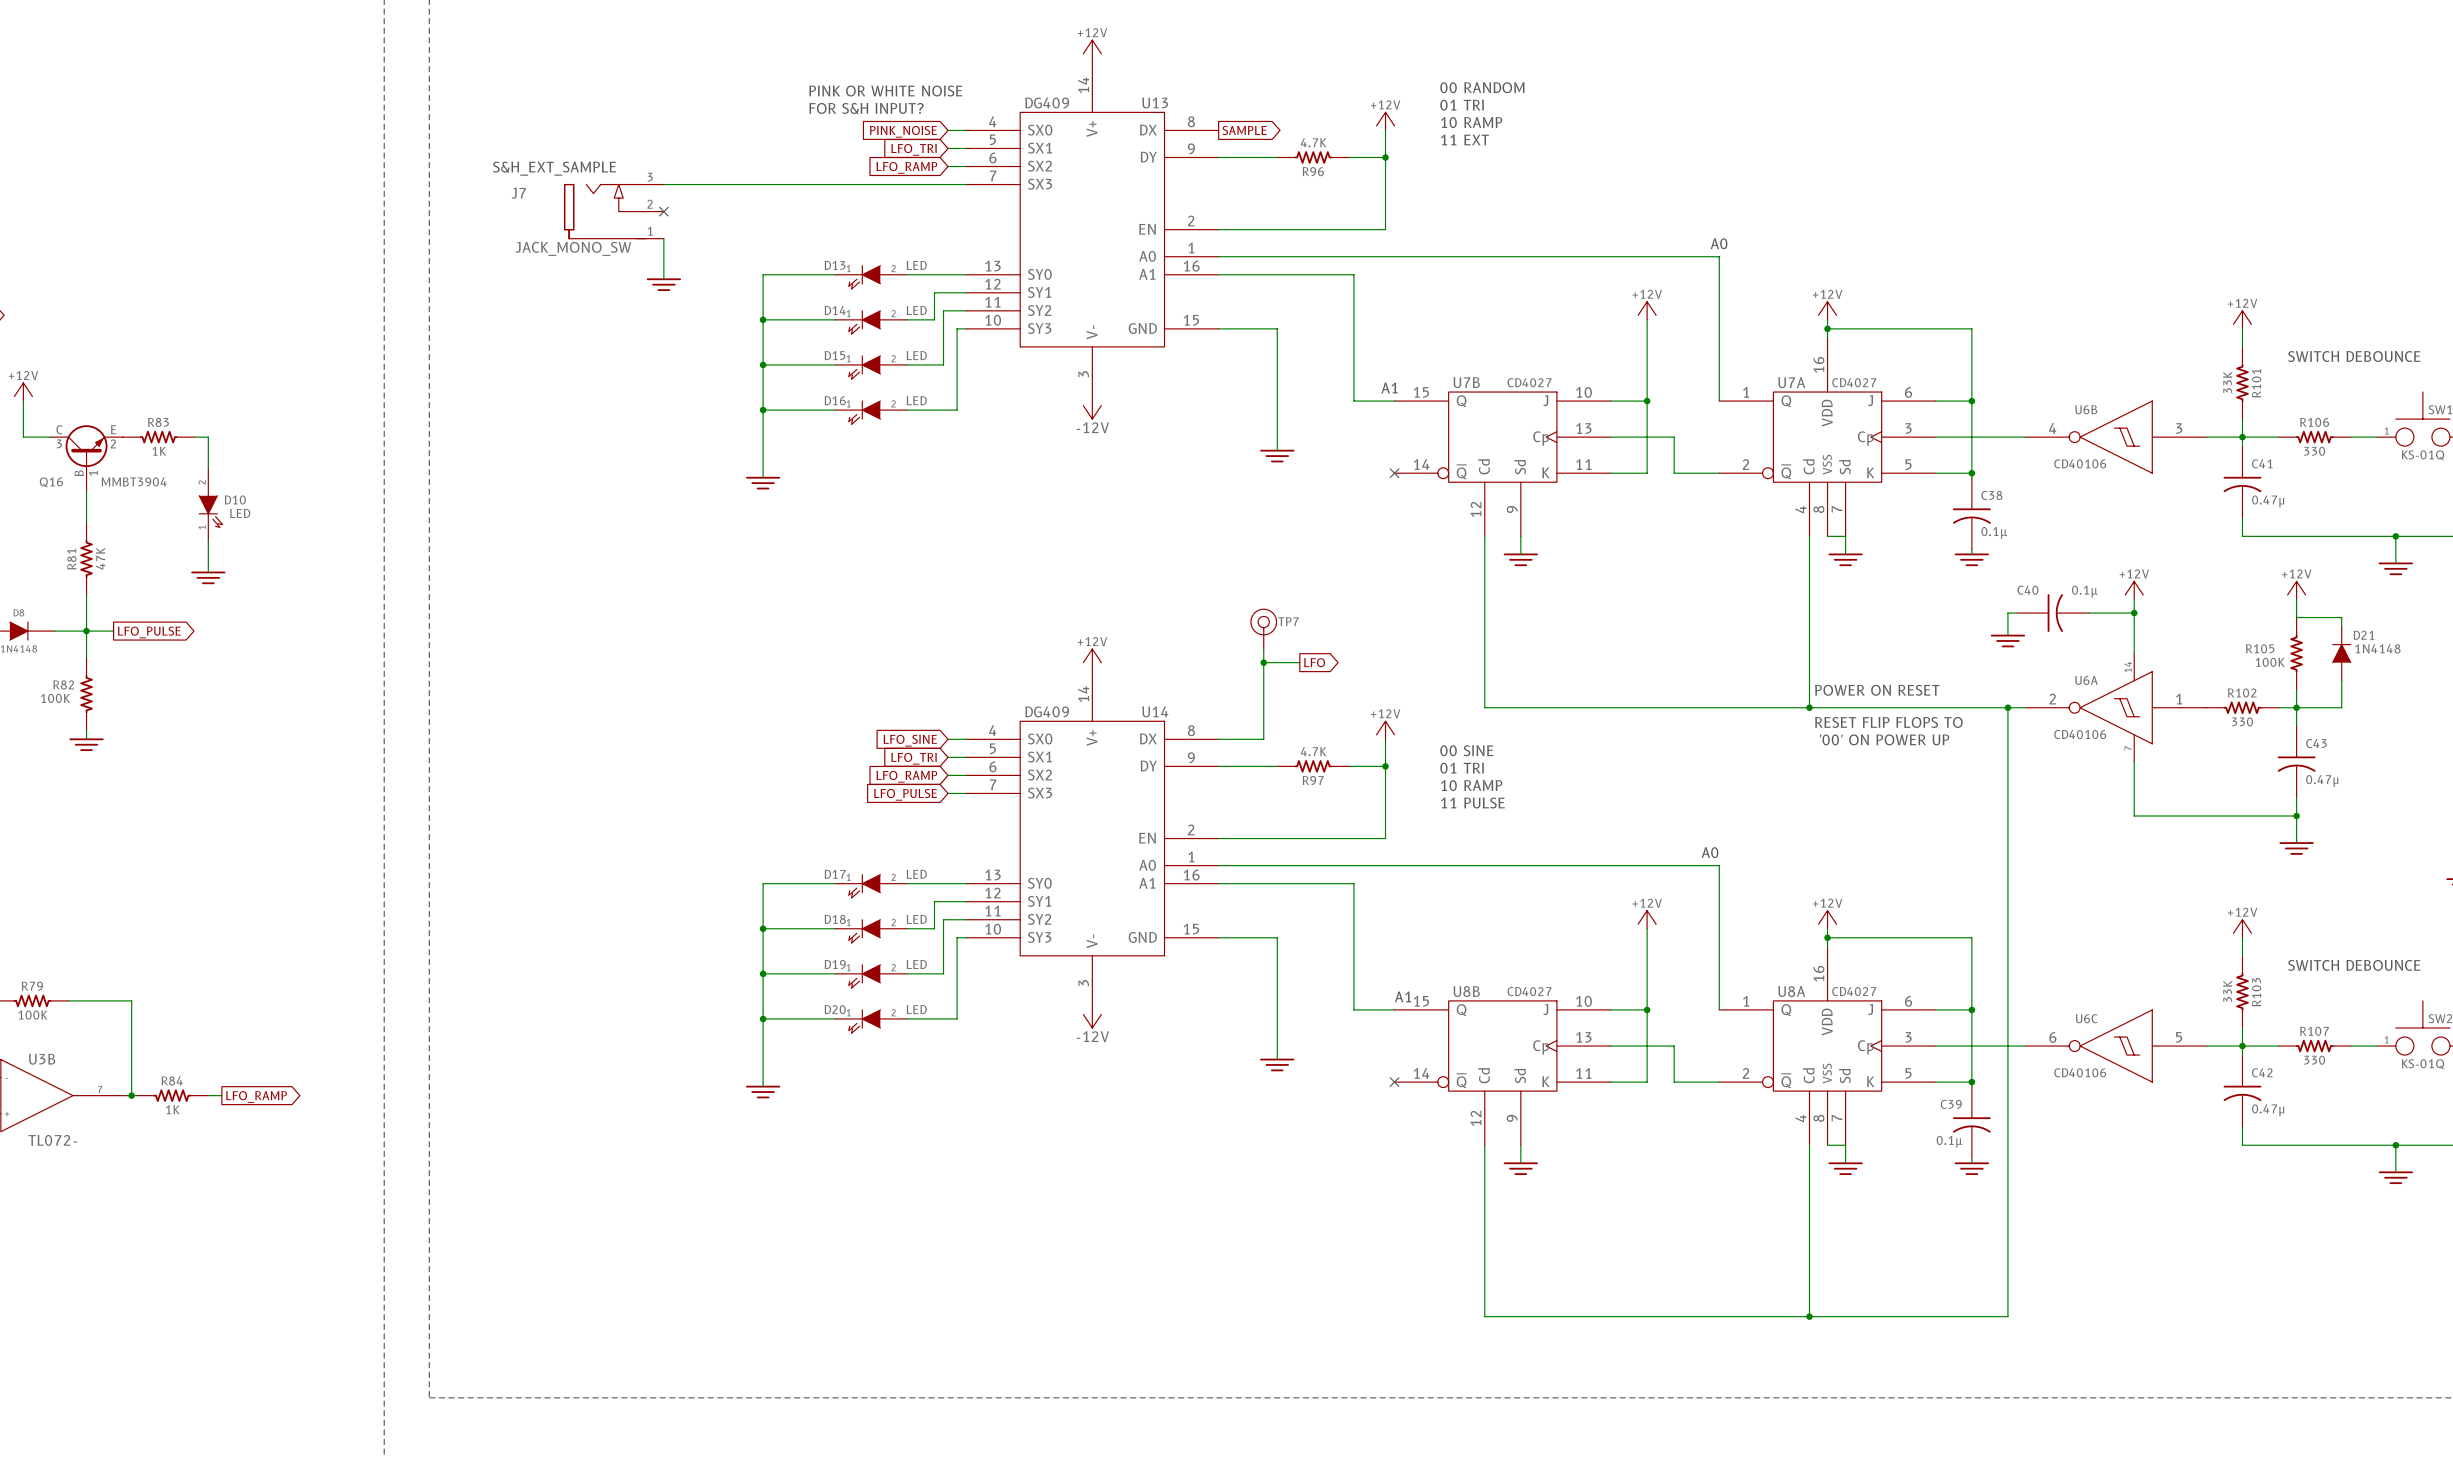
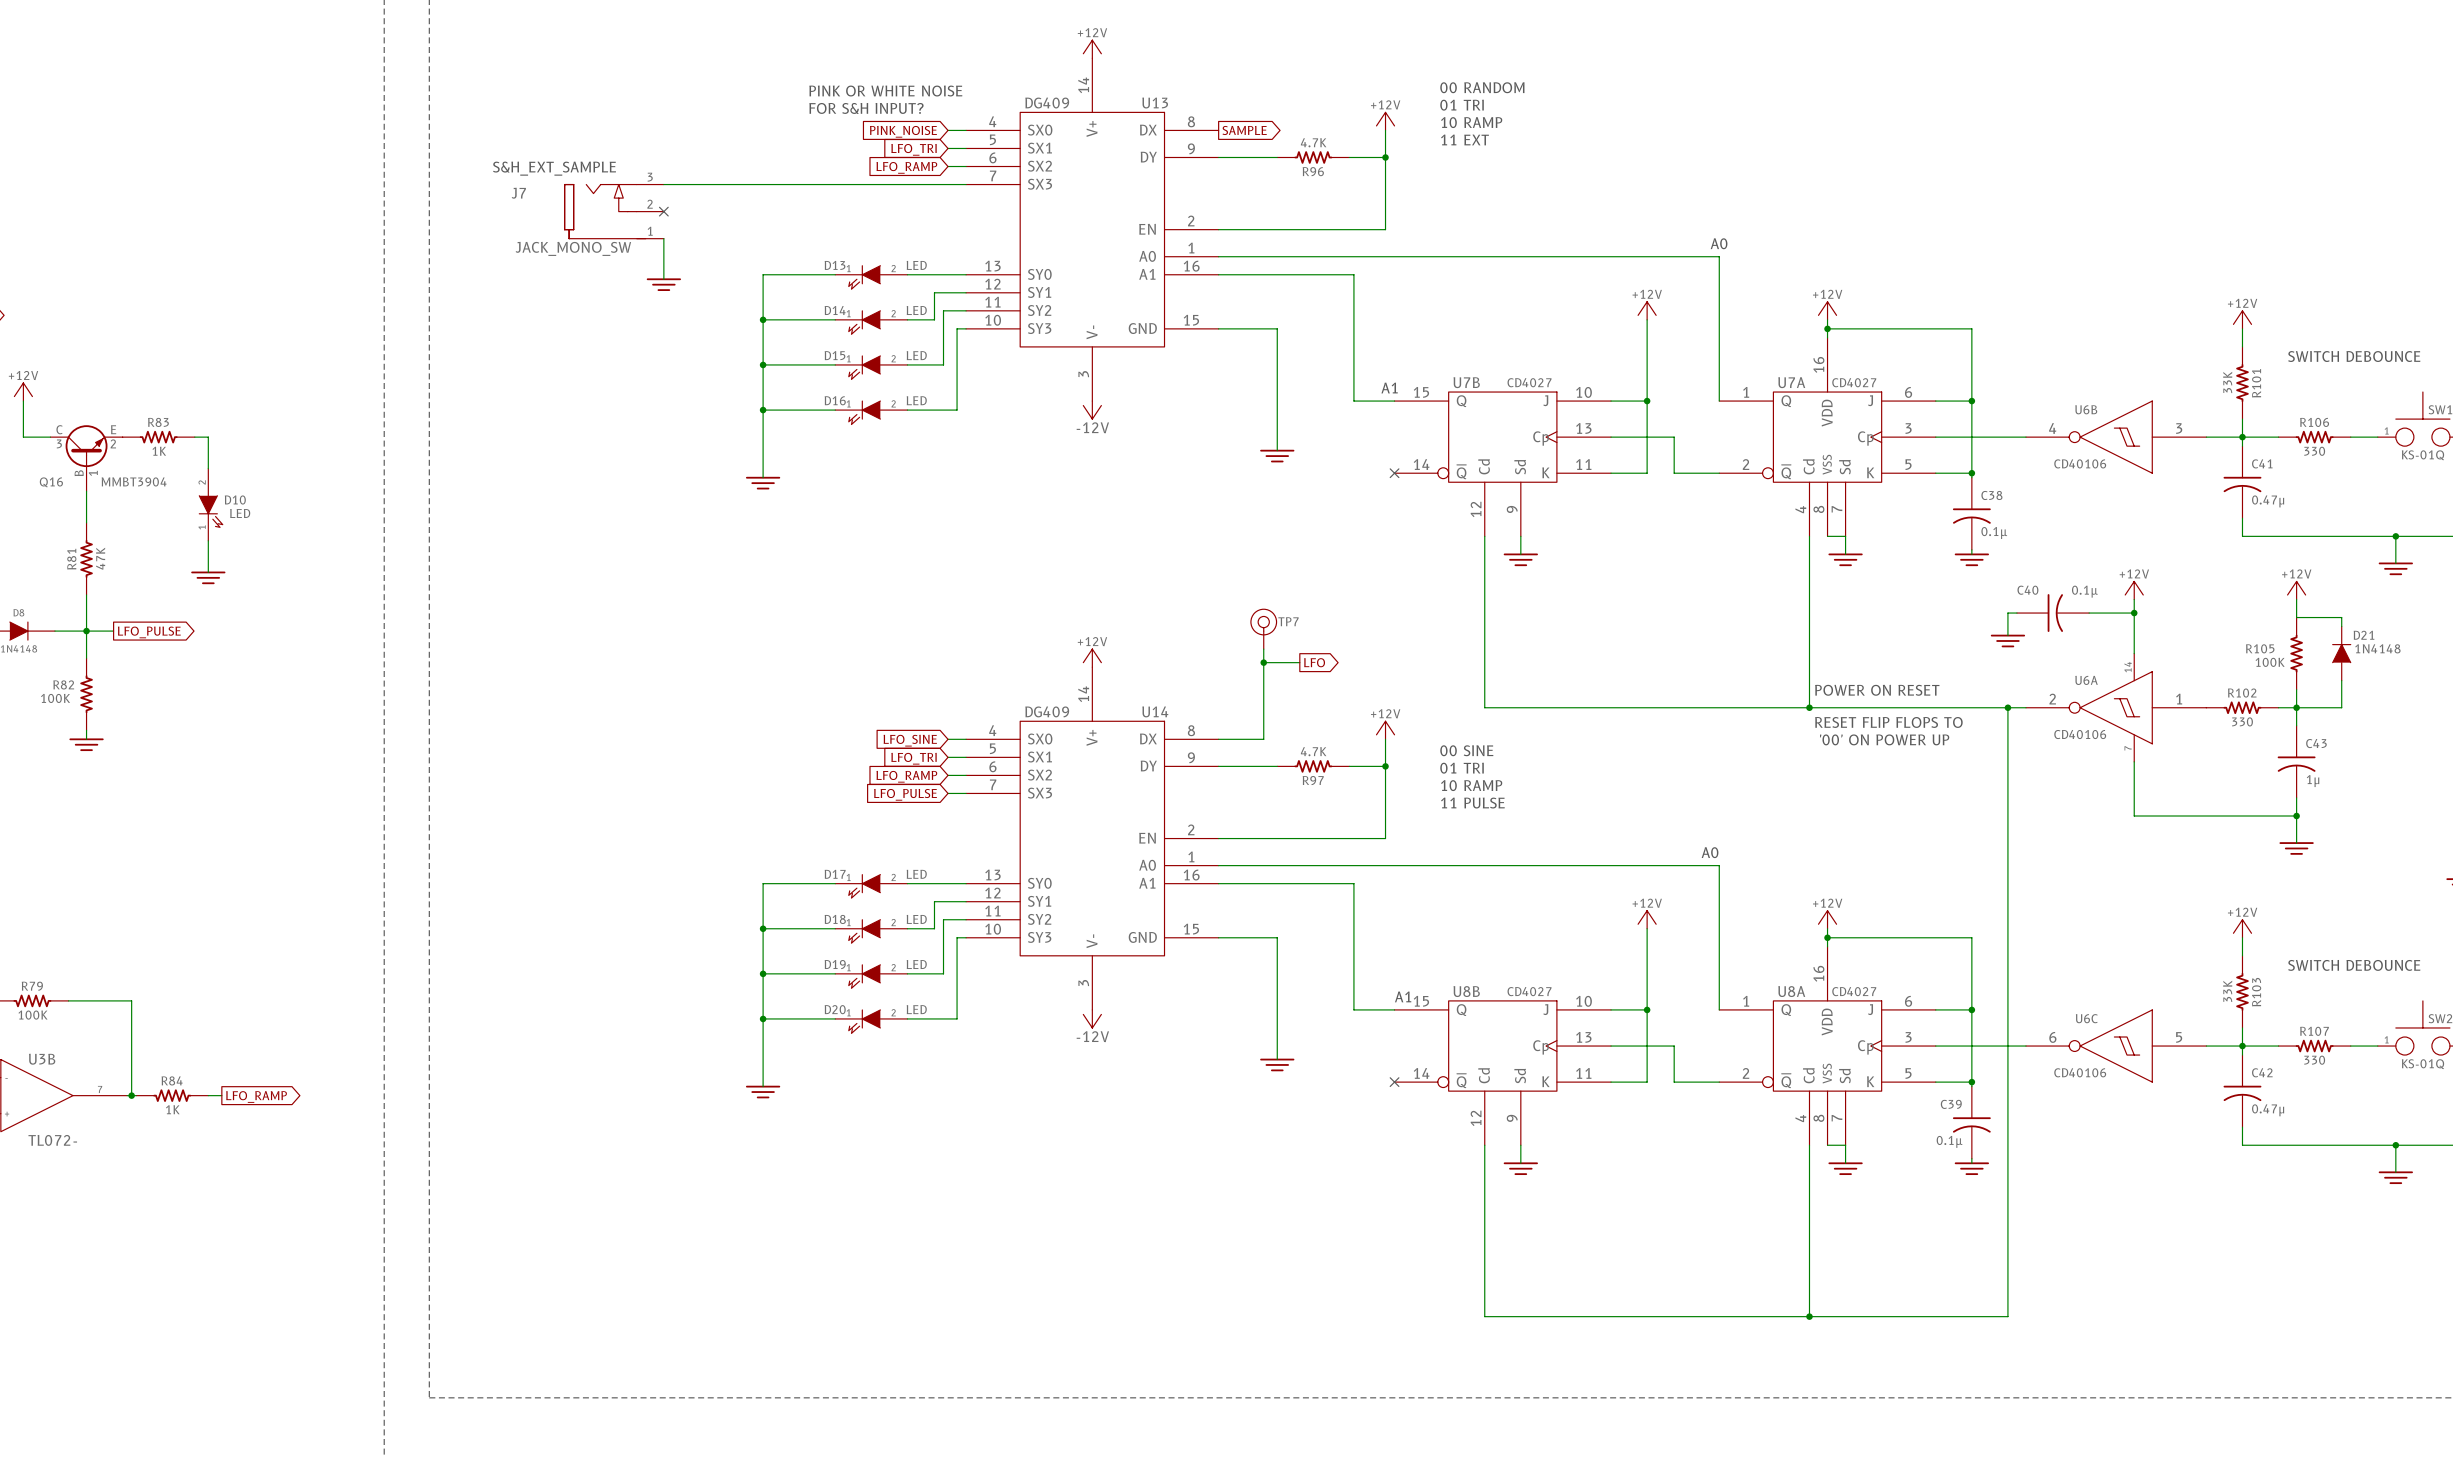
C43 value: 0.47μ (2322, 781) -> 1μ (2313, 781)

